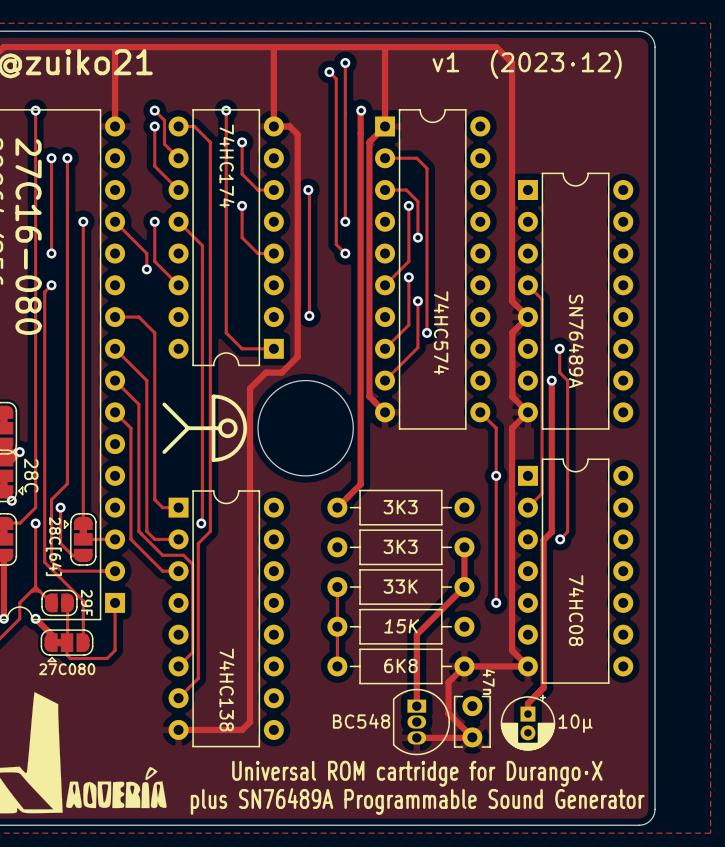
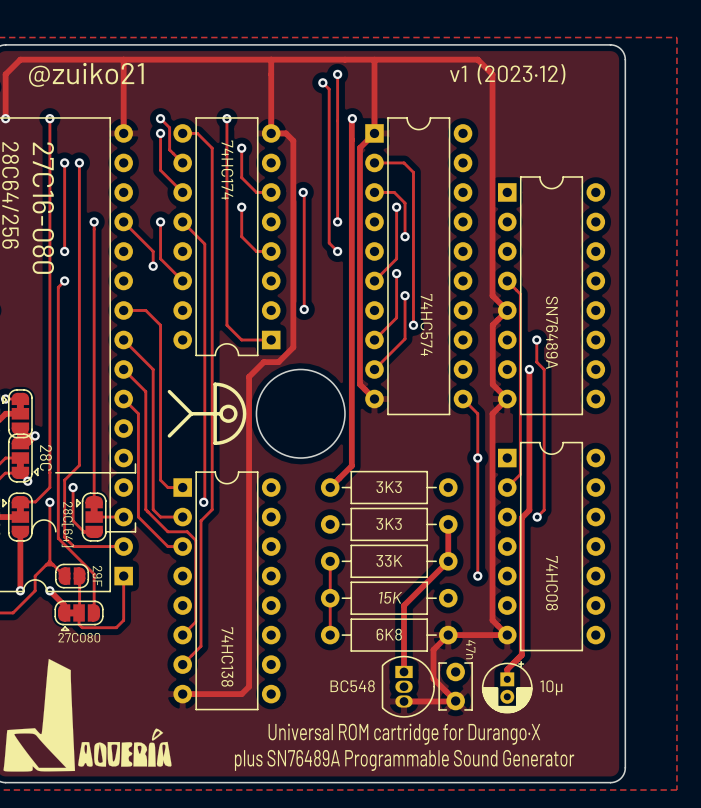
line: none -> (135, 463) (135, 472) (55, 472)
line: none -> (135, 522) (135, 531) (105, 531)
line: none -> (32, 531) (35, 523) (43, 520) (52, 523) (55, 531)

